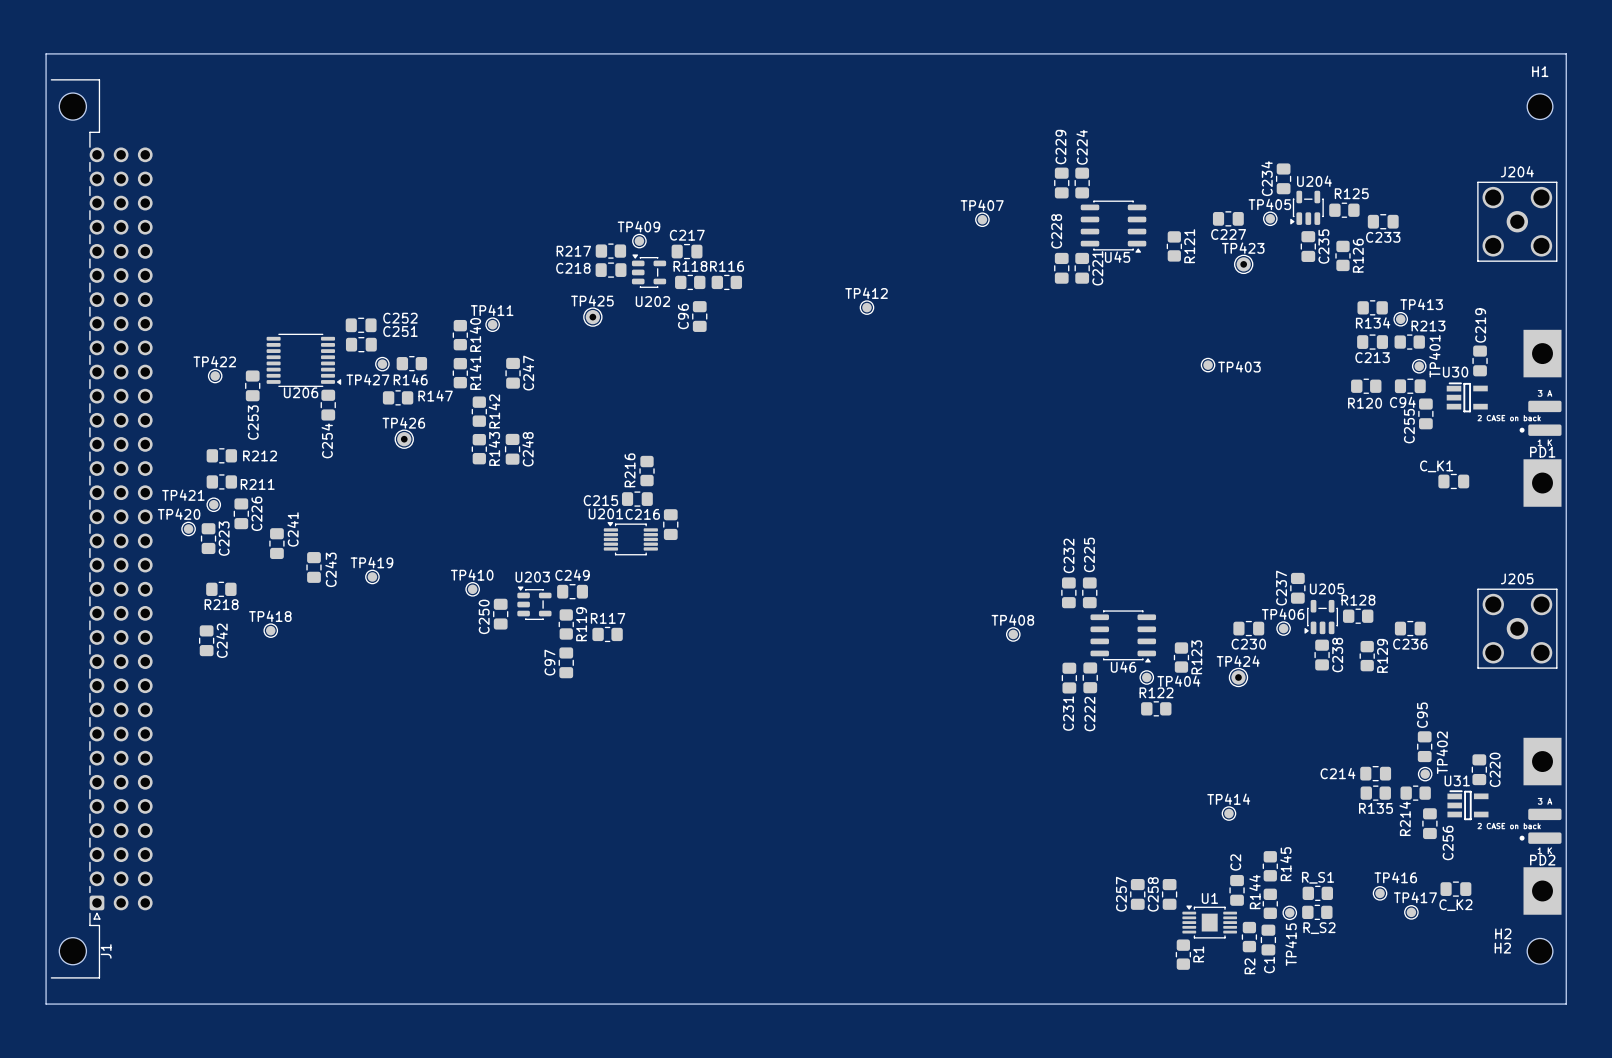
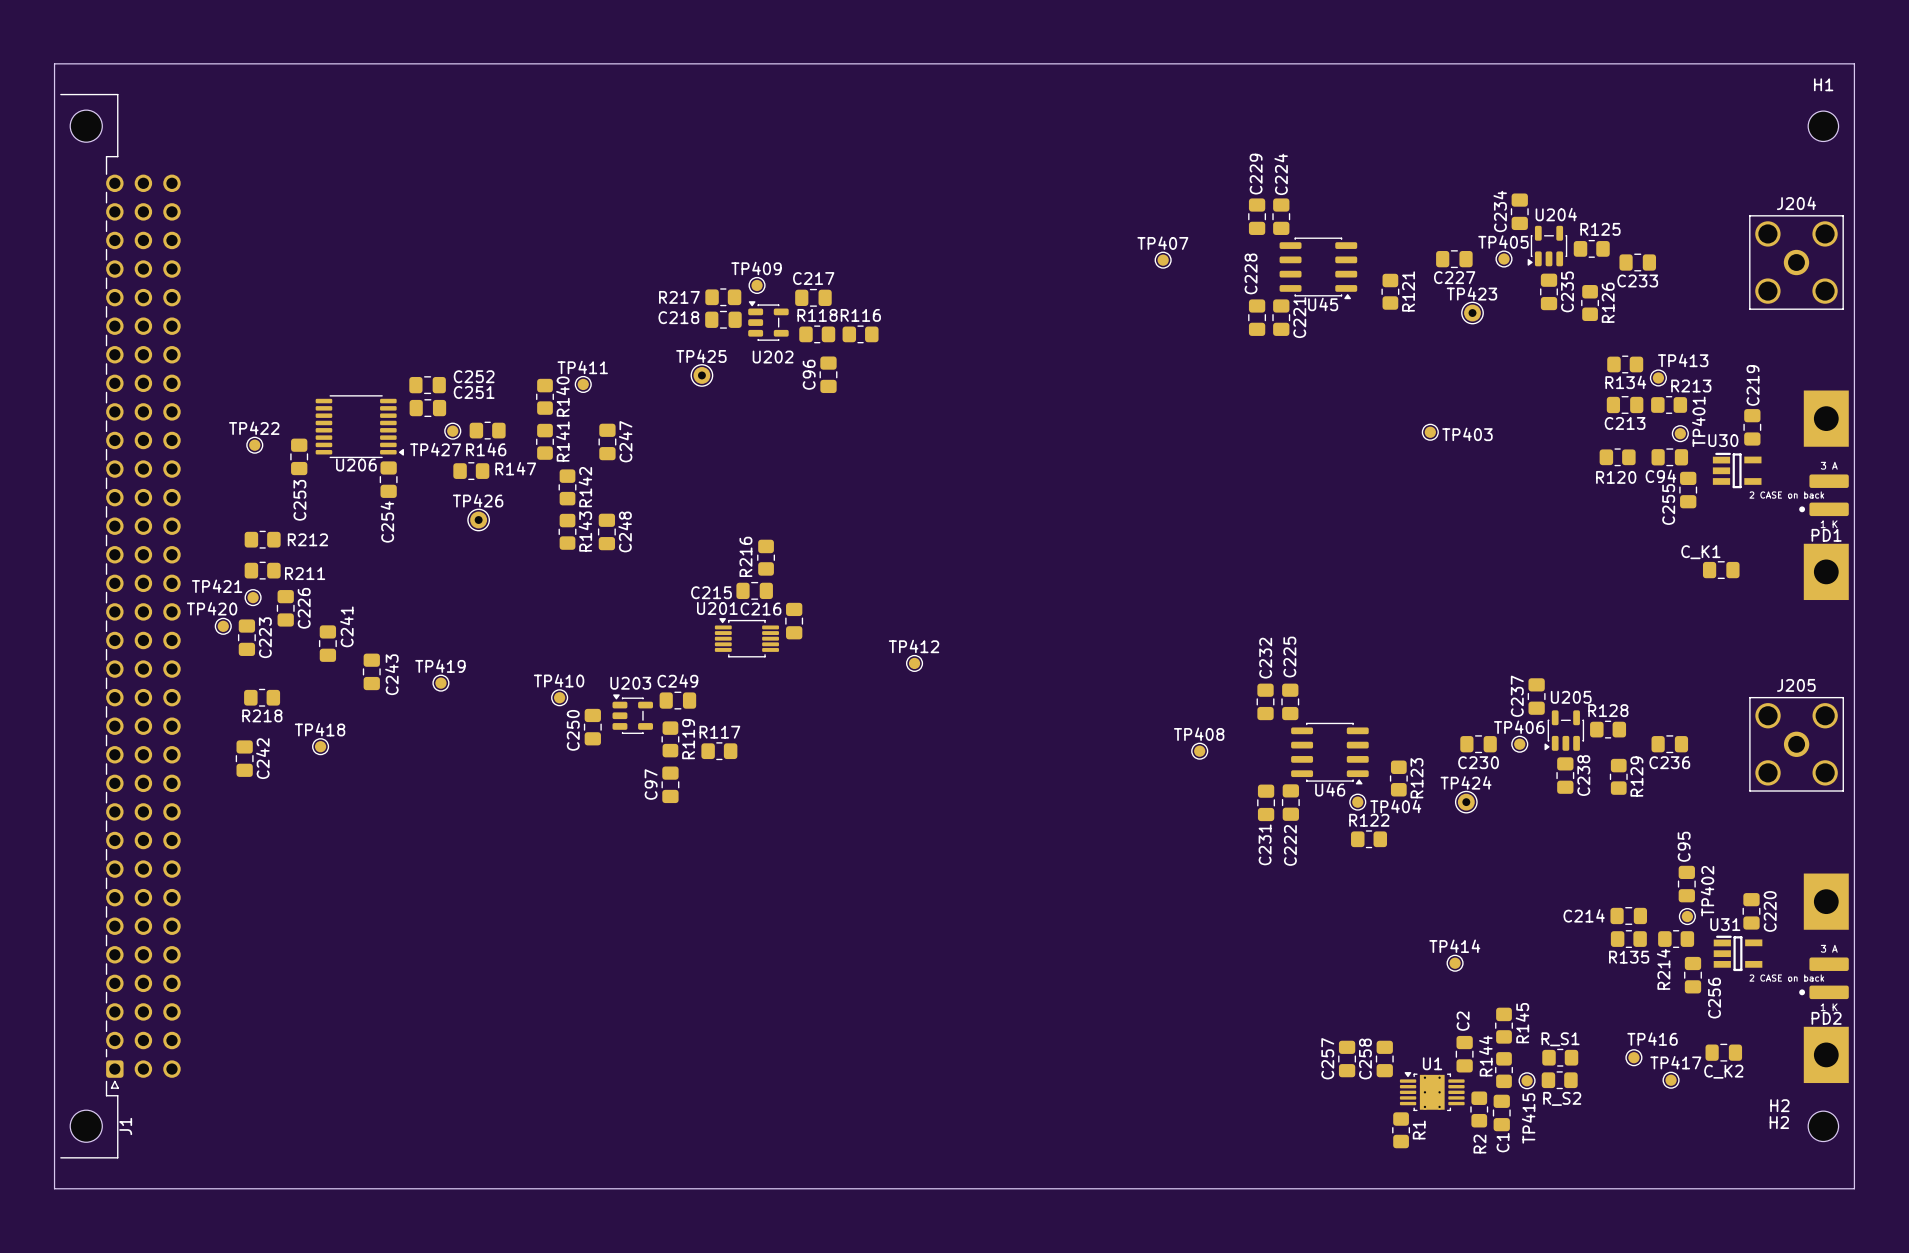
TP412 position: (866, 307) -> (914, 663)
U1 footprint: [1182, 905, 1238, 939] -> [1399, 1072, 1465, 1112]

